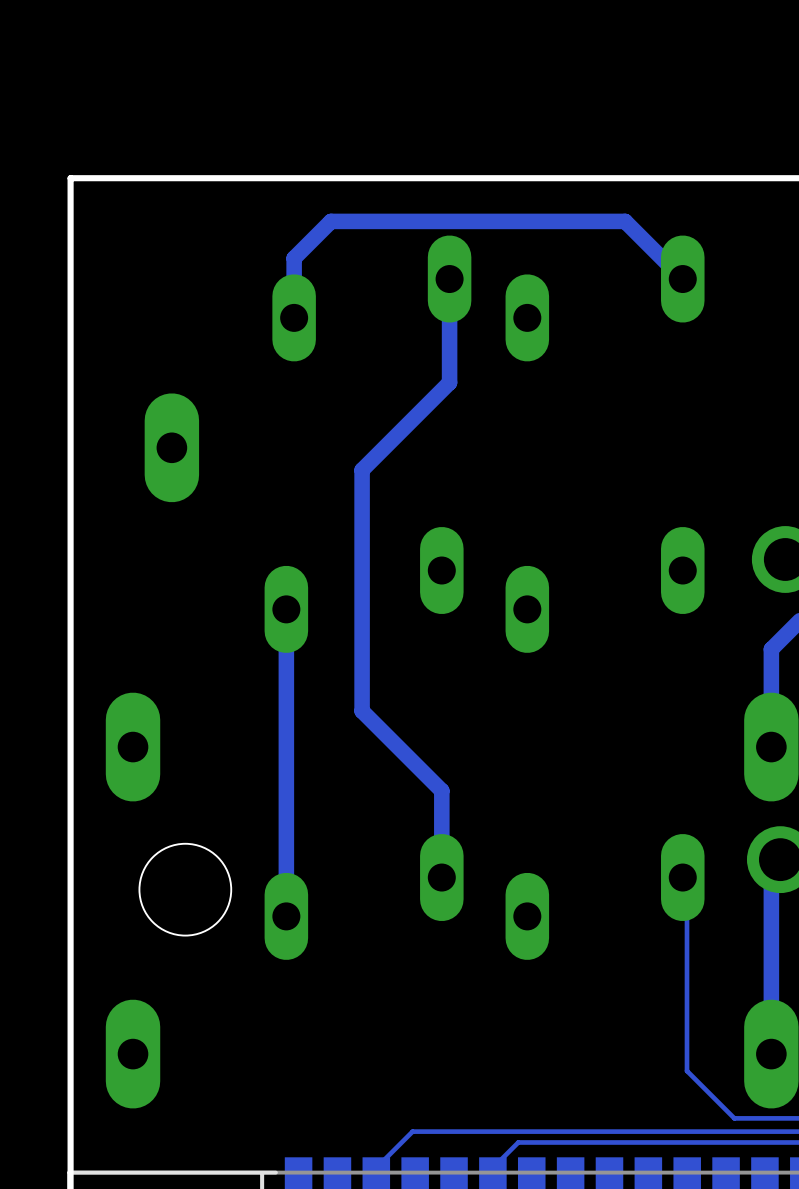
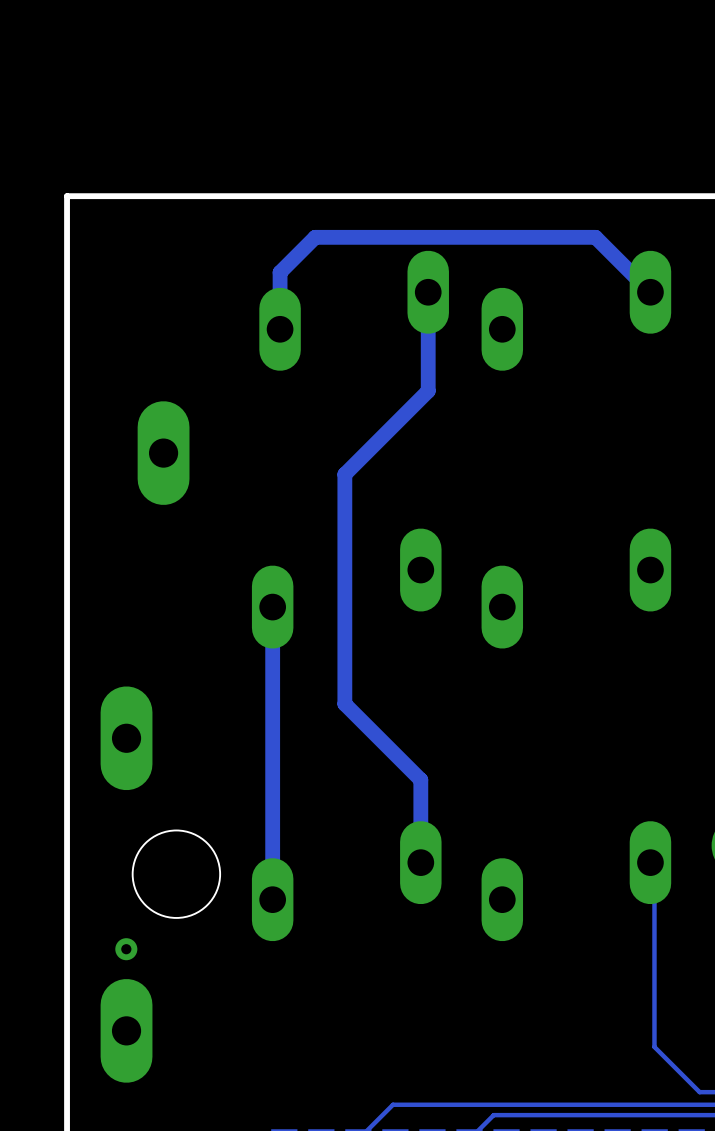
via: none -> (126, 949)

